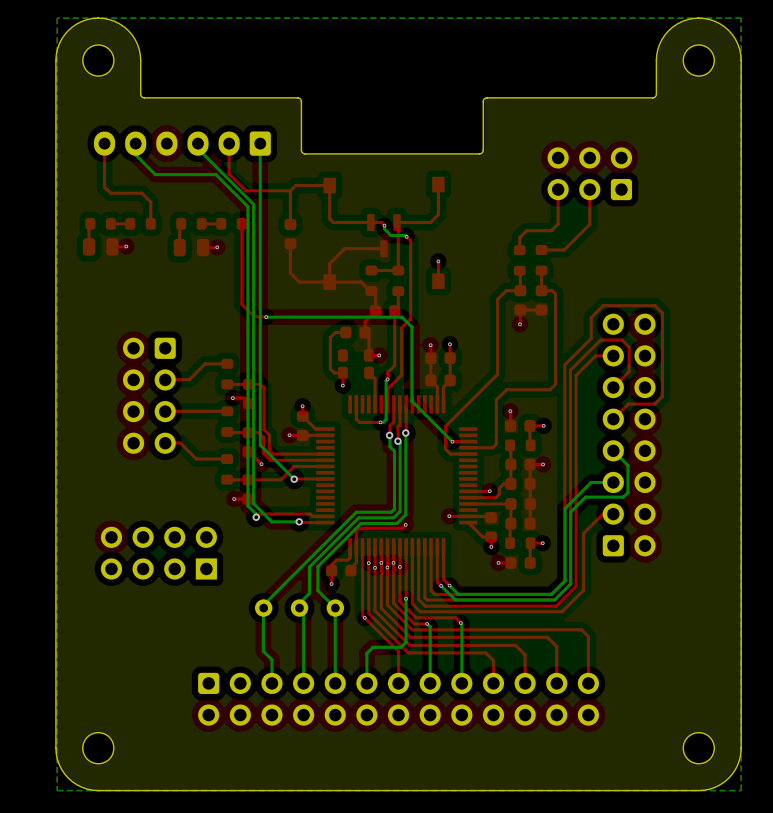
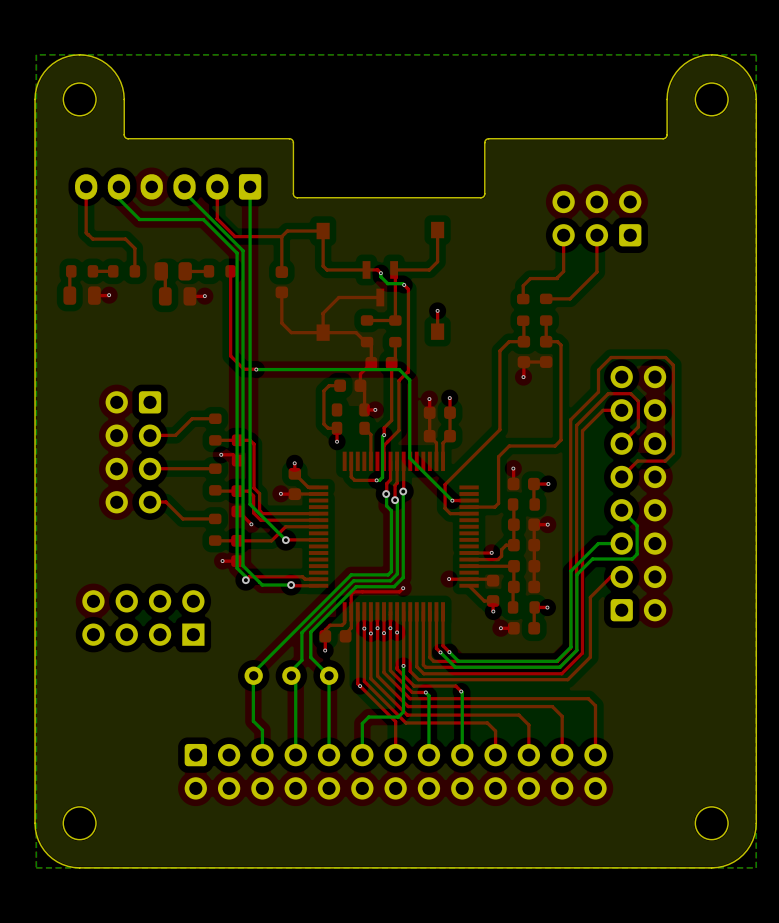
part footprint: [176, 217, 207, 230] -> [154, 262, 192, 281]

